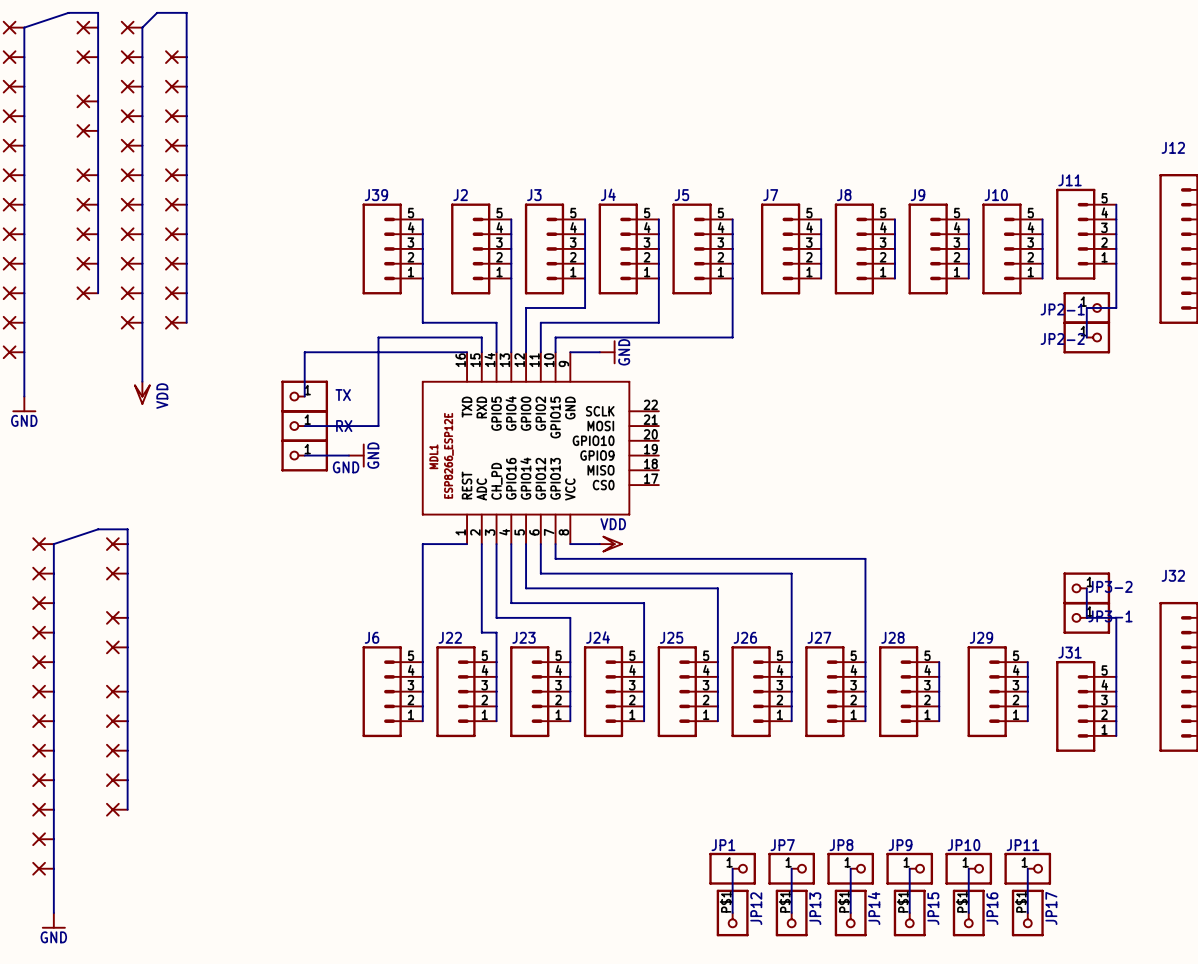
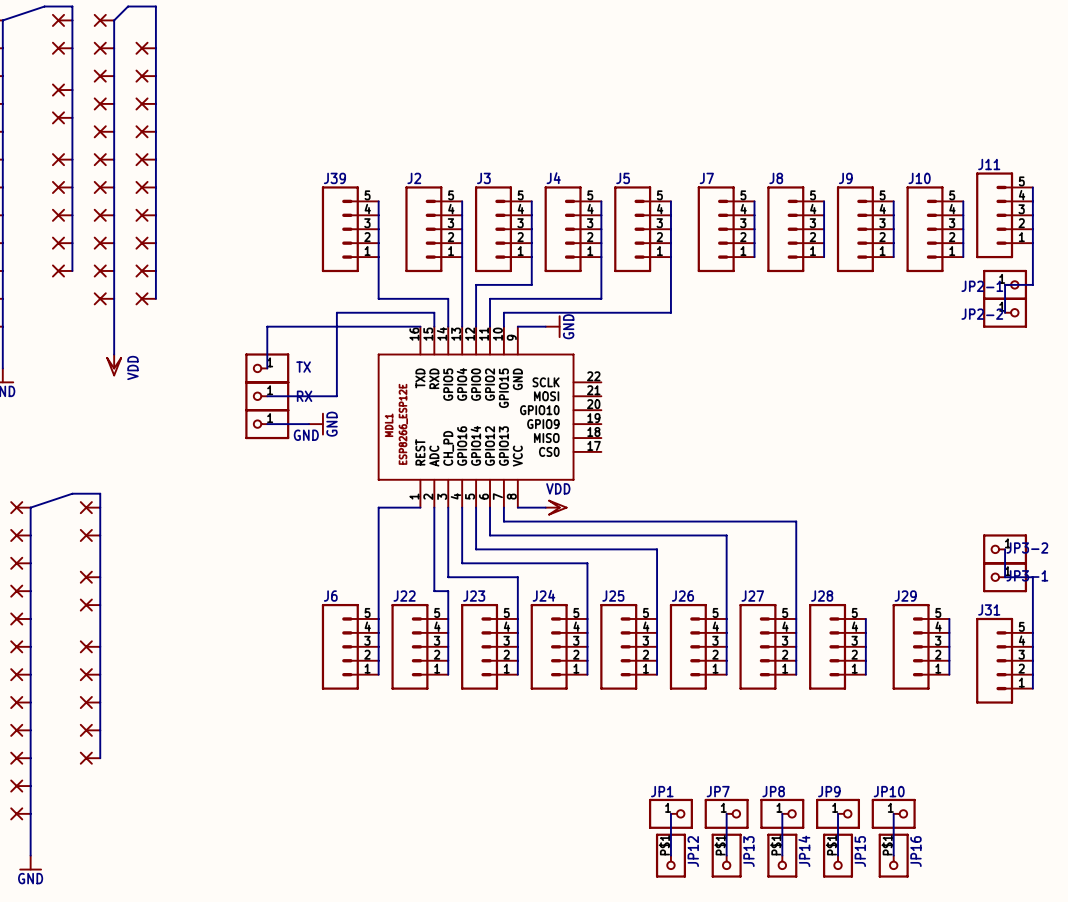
wire: (1027, 868) (1027, 913) -> none
JP11: (1027, 868) -> none
JP17: (1027, 913) -> none

